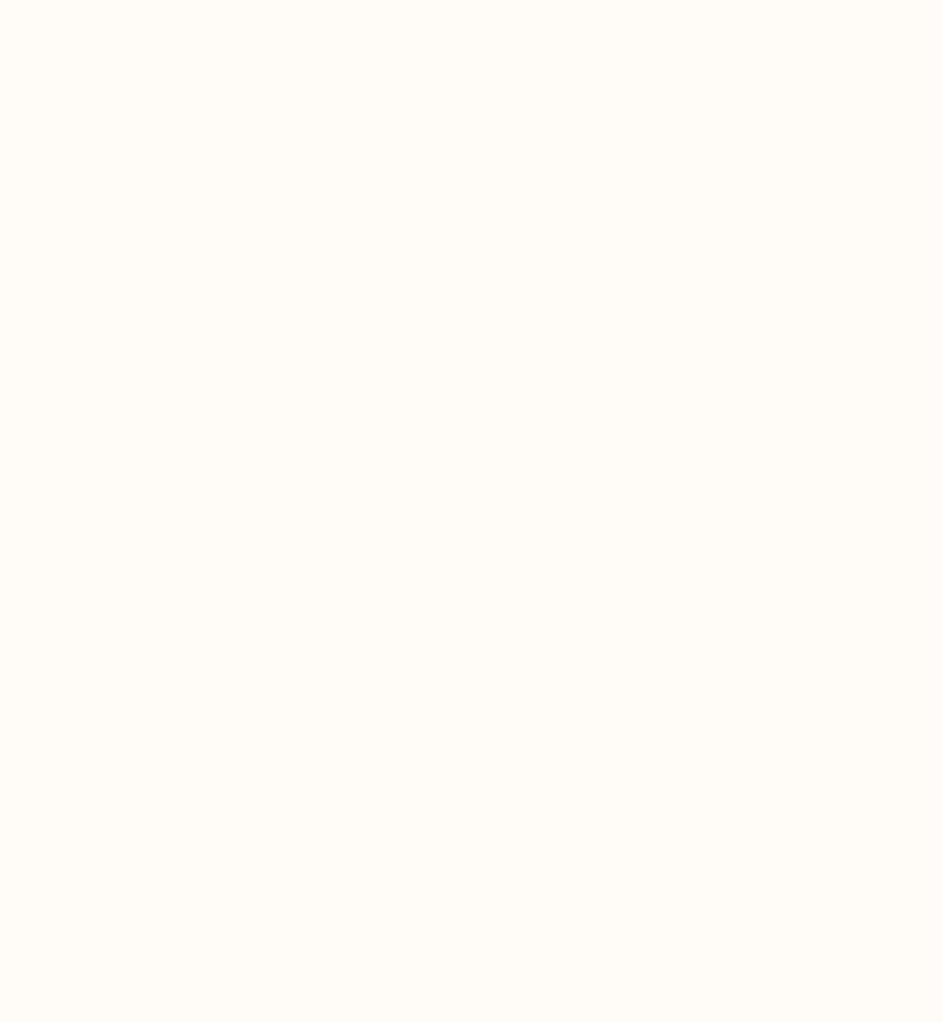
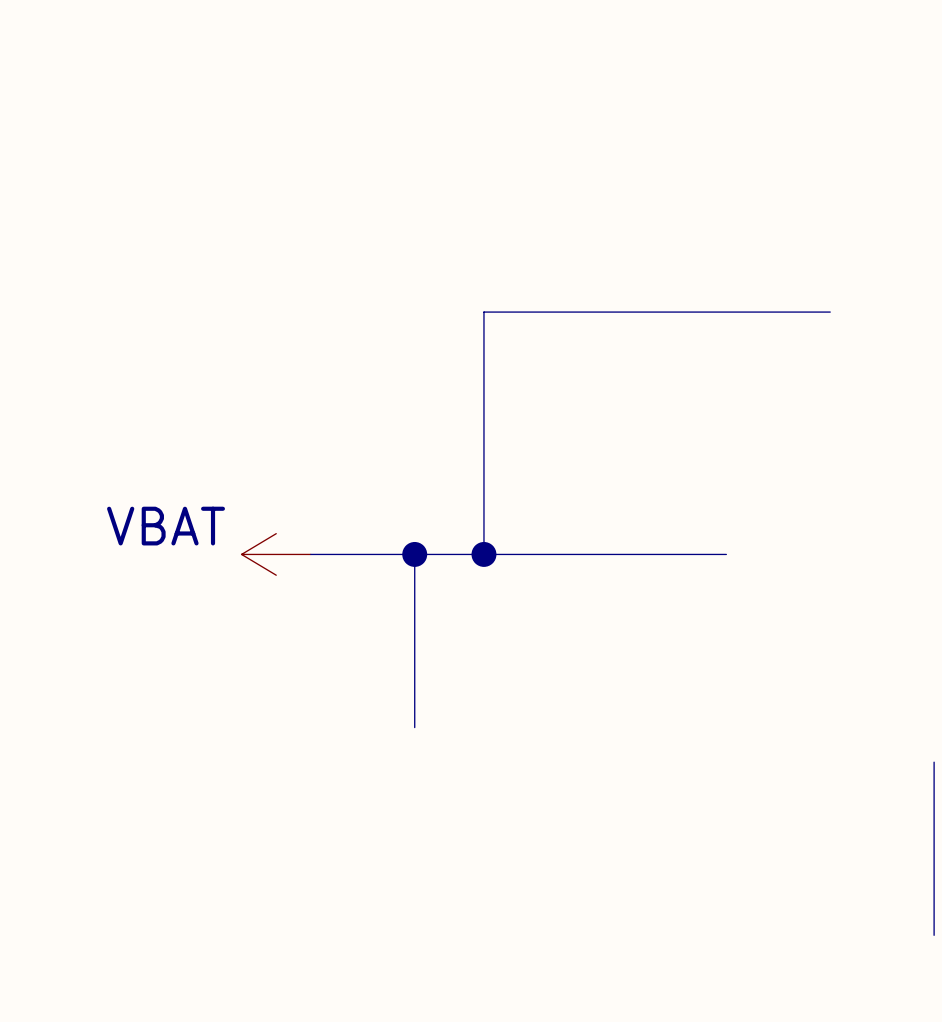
wire: none -> (830, 312) (483, 312) (483, 554)
text: none -> VBAT (166, 526)
power symbol: none -> (276, 554)
wire: none -> (310, 554) (726, 554)
wire: none -> (414, 554) (414, 727)
junction: none -> (414, 554)
junction: none -> (483, 554)
wire: none -> (934, 762) (934, 935)

